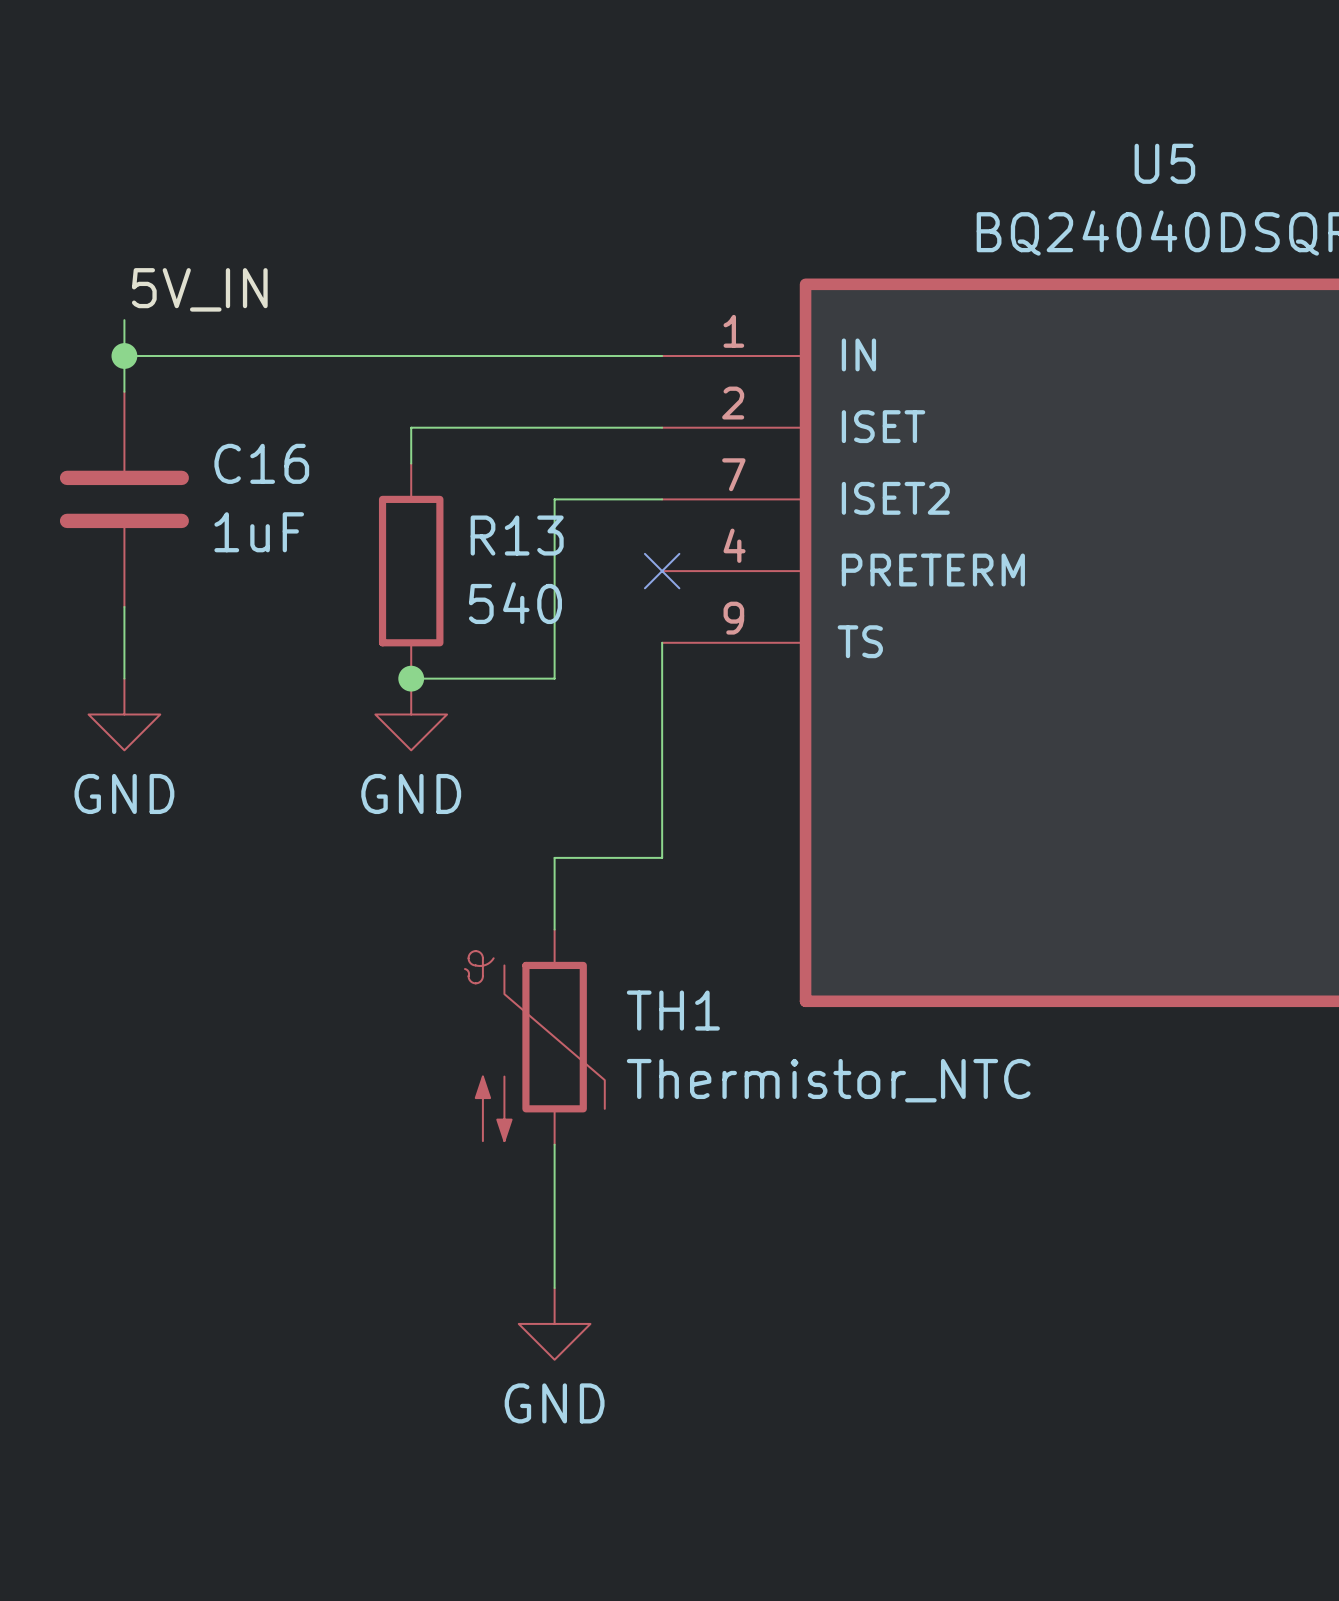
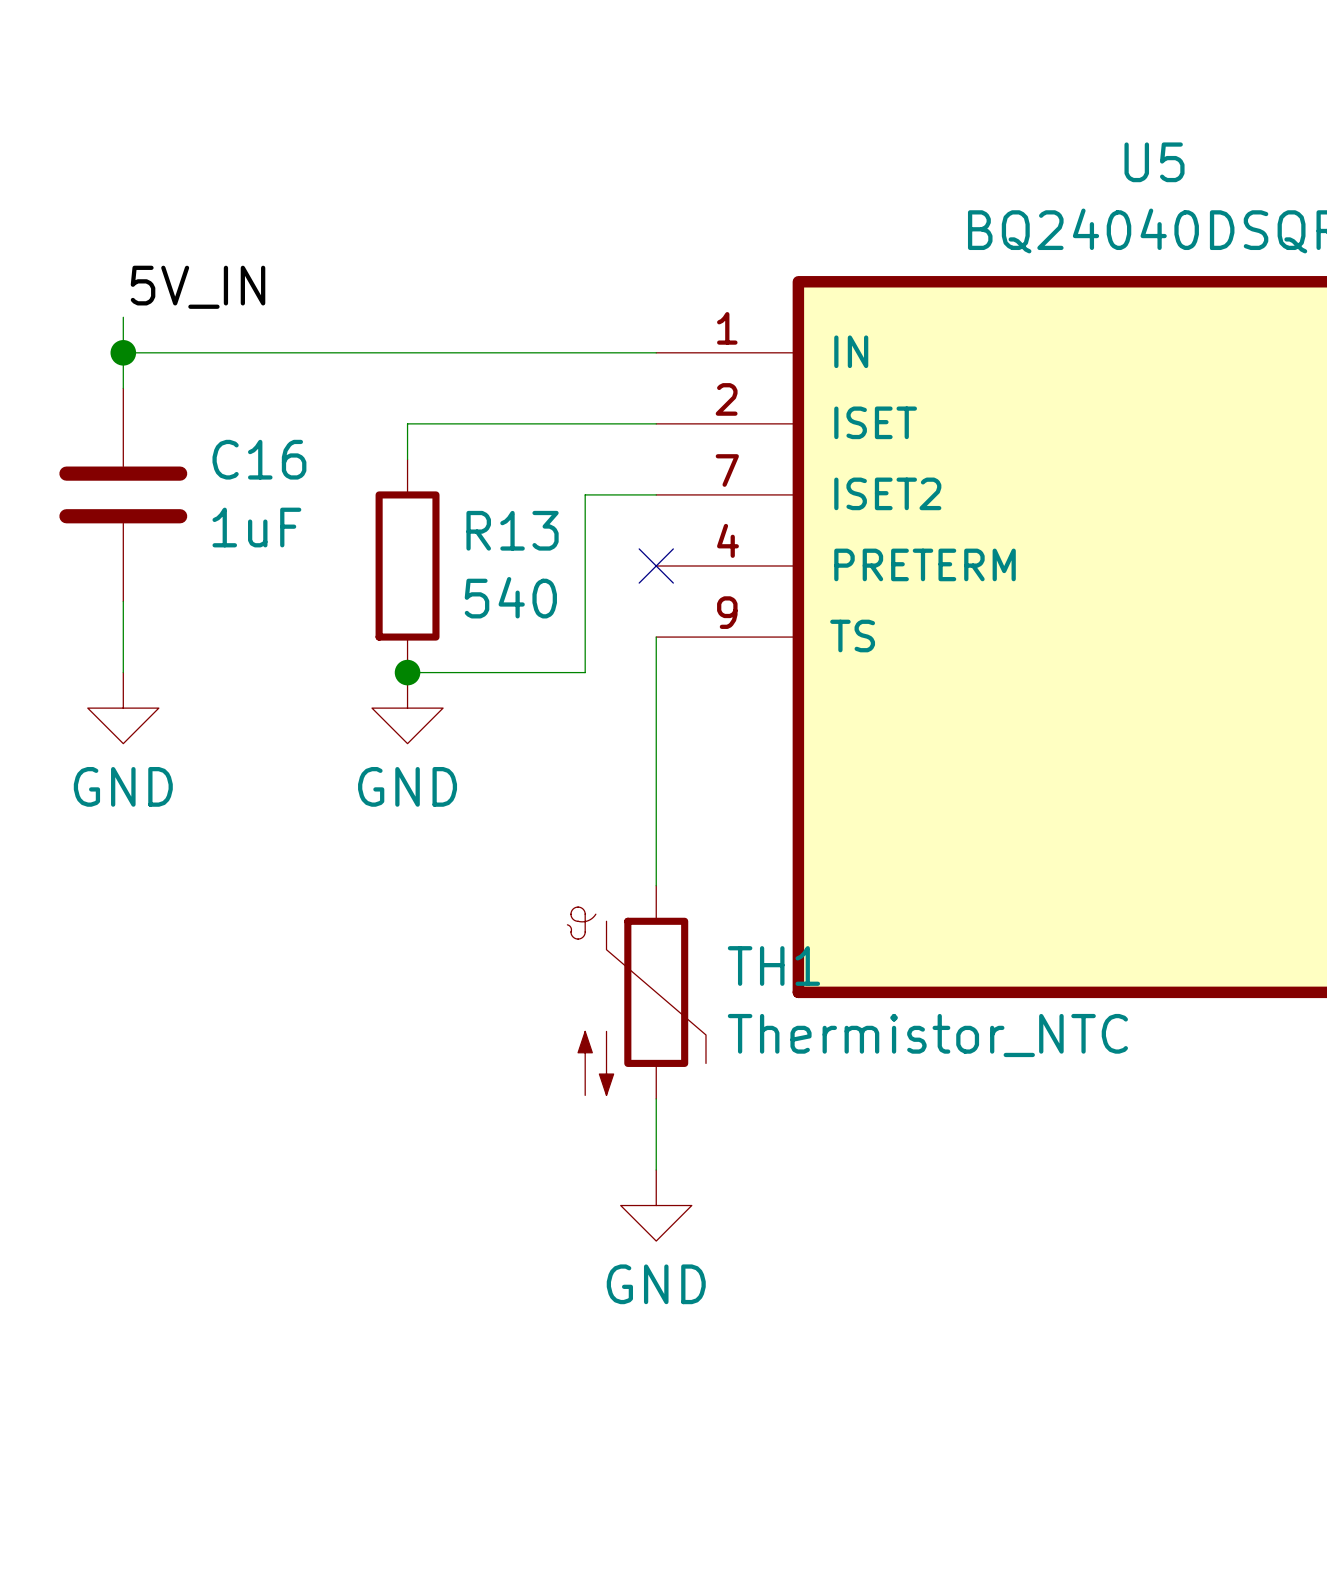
wire: (590, 499) (554, 499) (554, 678) -> (585, 494) (585, 672) (549, 672)
wire: (662, 857) (554, 857) (554, 929) -> (656, 850) (656, 885)
TH1 position: (534, 1037) -> (636, 992)
wire: none -> (656, 1098) (656, 1170)
wire: (554, 1144) (554, 1288) -> none
power symbol position: GND (554, 1323) -> GND (656, 1205)

